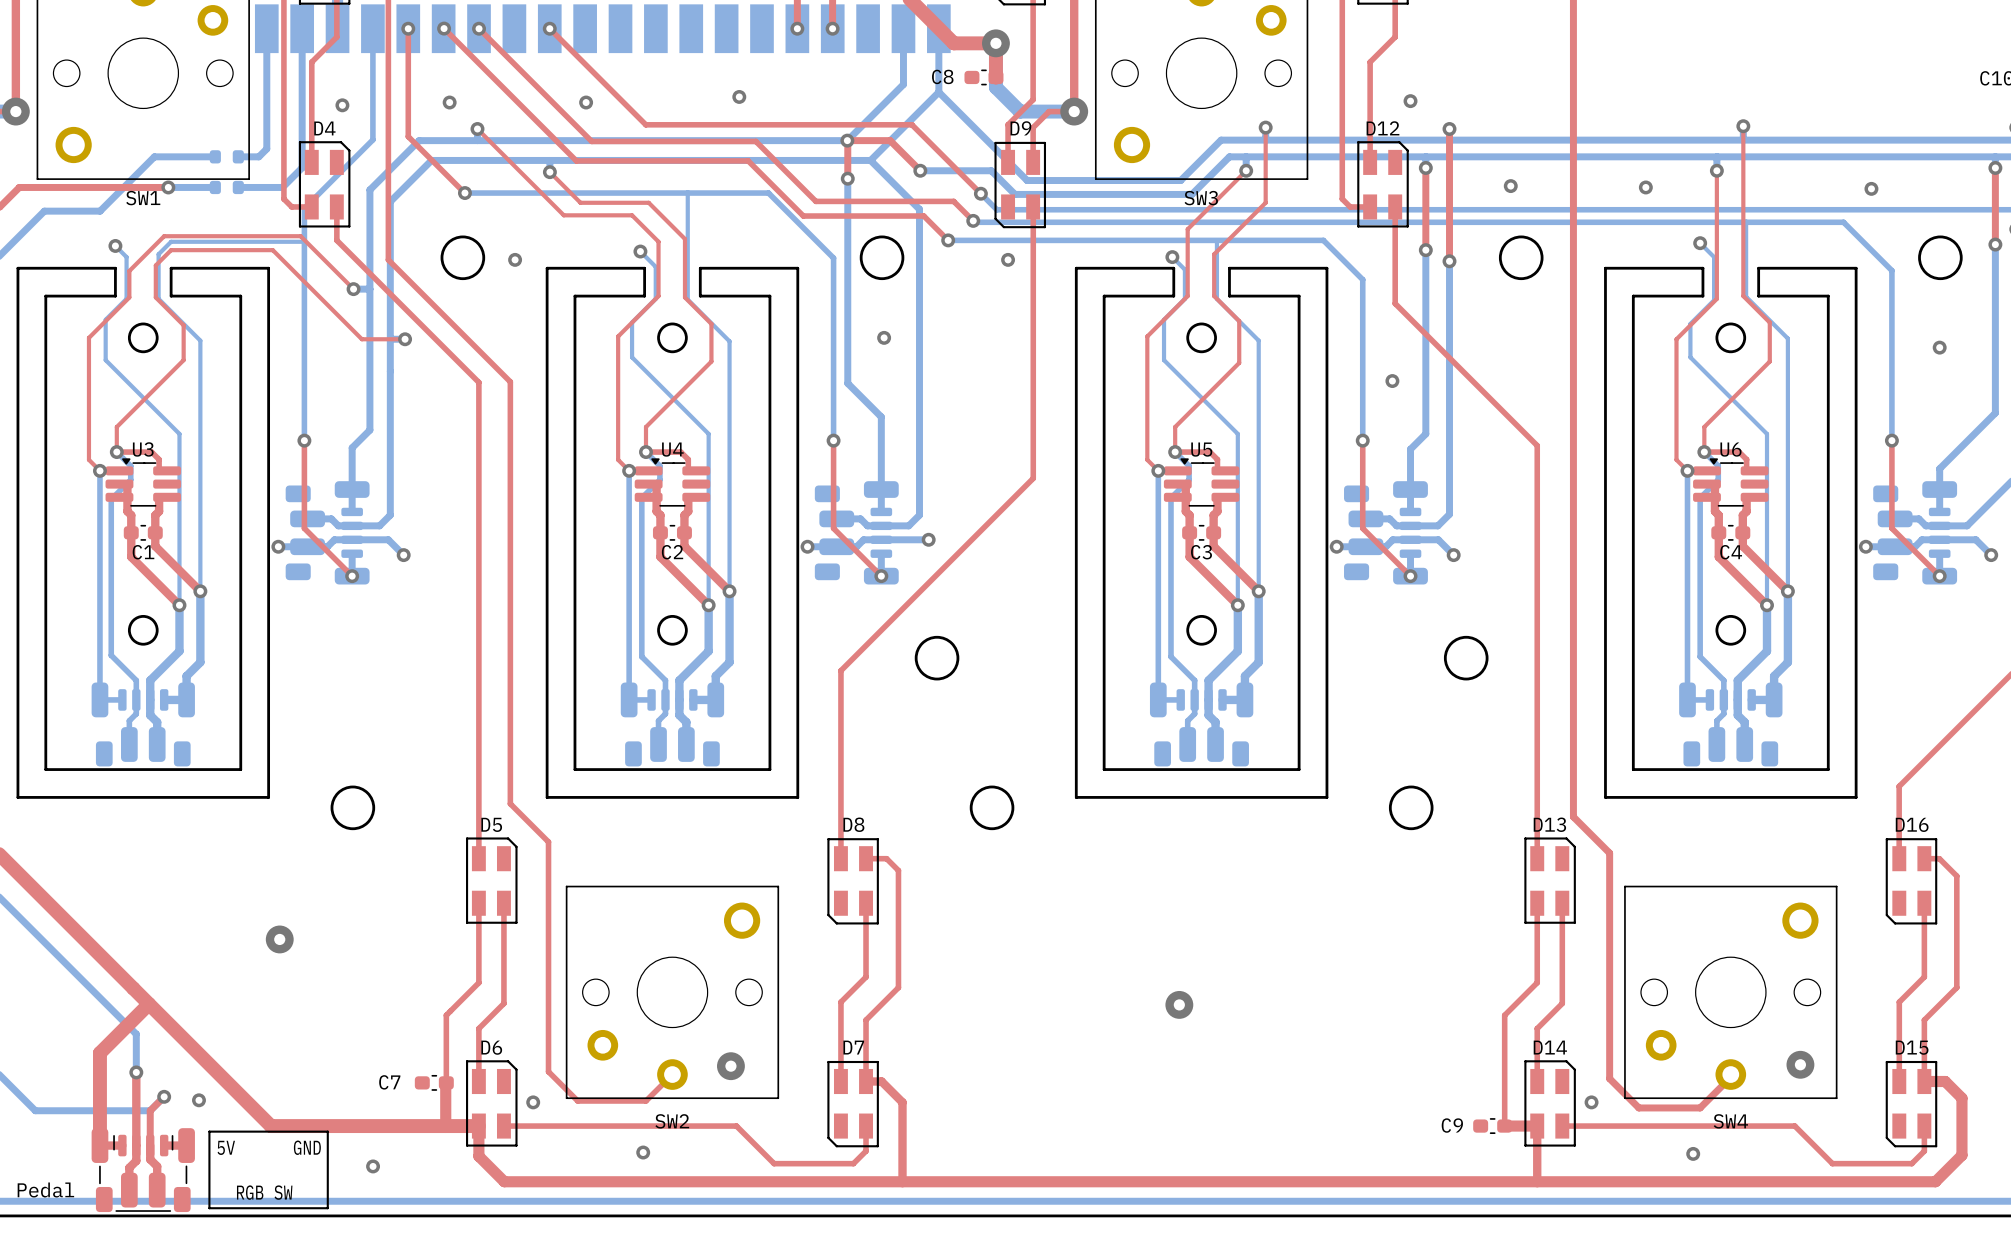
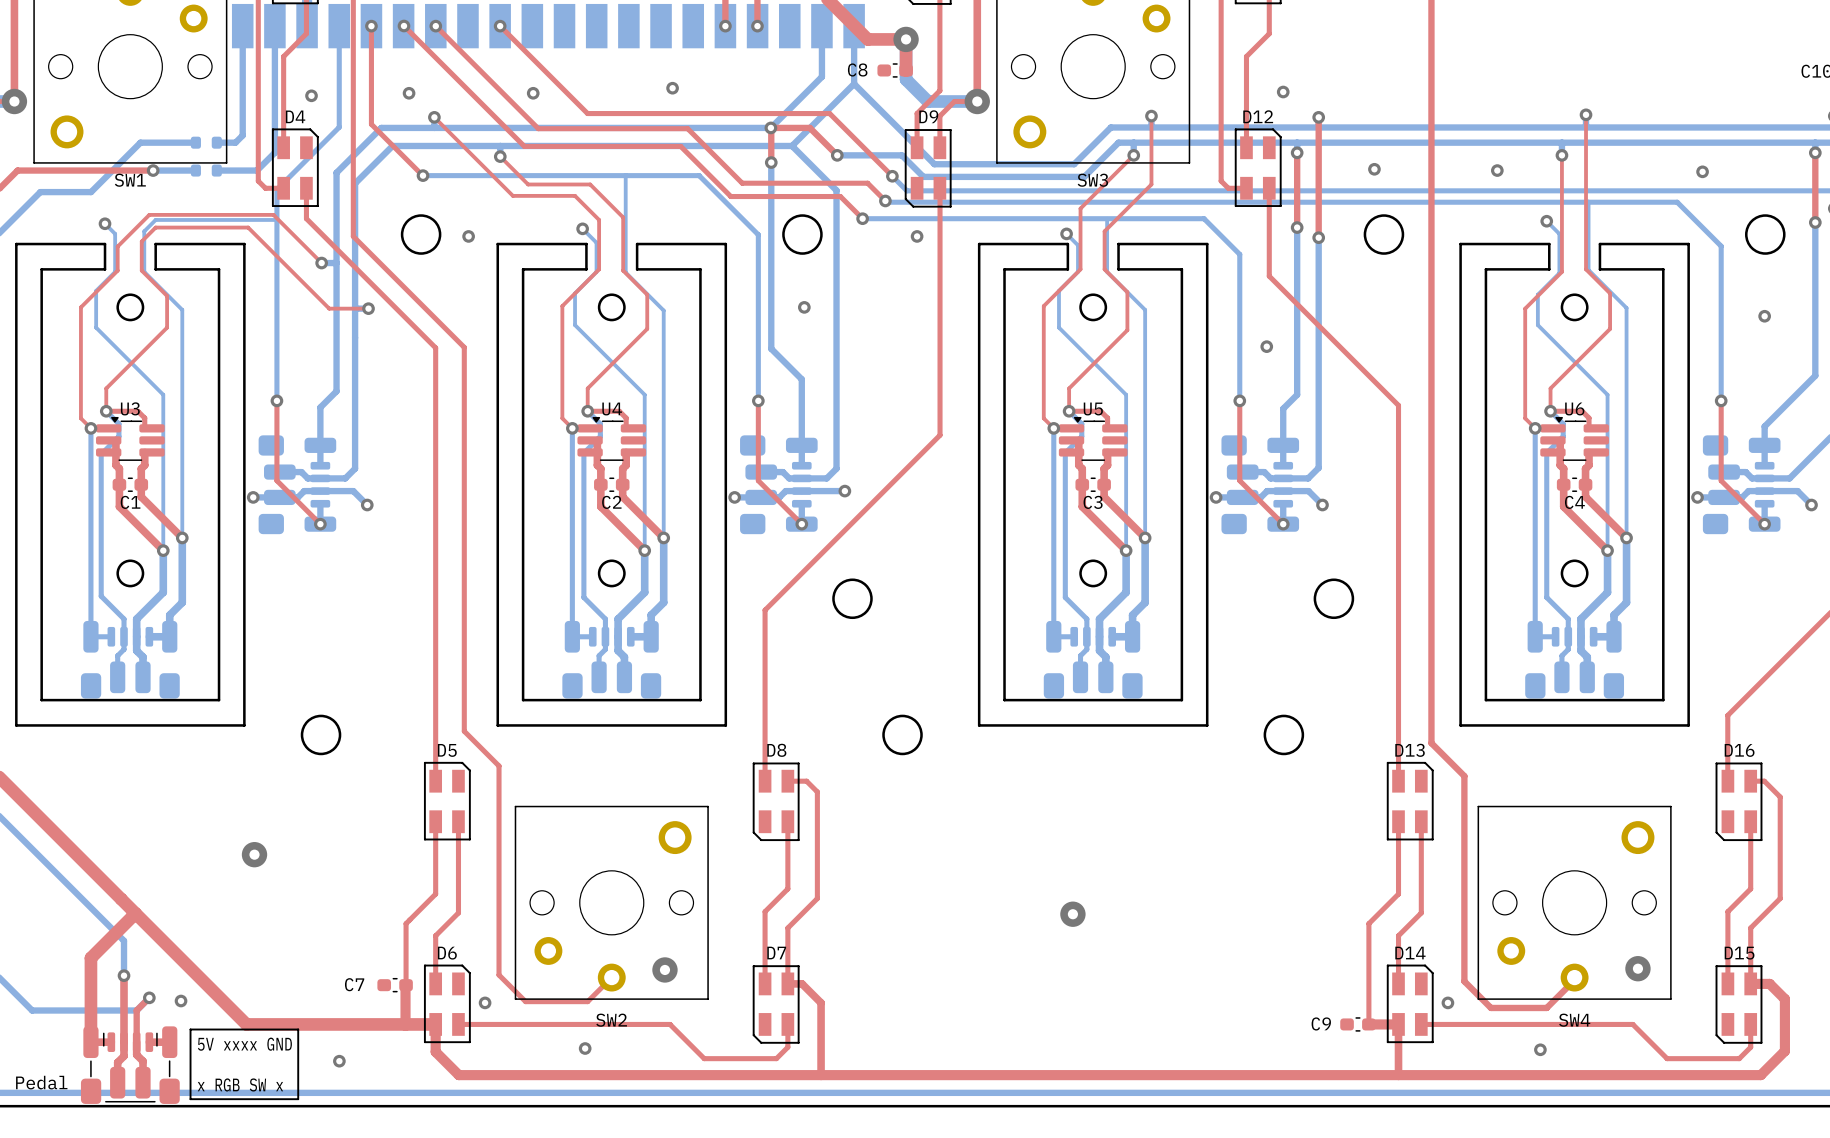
part footprint: [285, 481, 370, 585] -> [258, 435, 337, 535]
part footprint: [814, 481, 899, 585] -> [740, 435, 818, 535]
part footprint: [1344, 481, 1428, 585] -> [1221, 435, 1300, 535]
part footprint: [1873, 481, 1958, 585] -> [1702, 435, 1781, 535]
part footprint: [91, 682, 195, 767] -> [80, 620, 180, 699]
part footprint: [620, 682, 725, 767] -> [562, 620, 662, 699]
part footprint: [1149, 682, 1254, 767] -> [1043, 620, 1143, 699]
part footprint: [1679, 682, 1783, 767] -> [1525, 620, 1625, 699]
part footprint: [91, 1128, 195, 1213] -> [80, 1026, 180, 1104]
text: 5V GND (269, 1147) -> 5V xxxx GND (244, 1044)
text: RGB SW (264, 1192) -> x RGB SW x (240, 1084)

